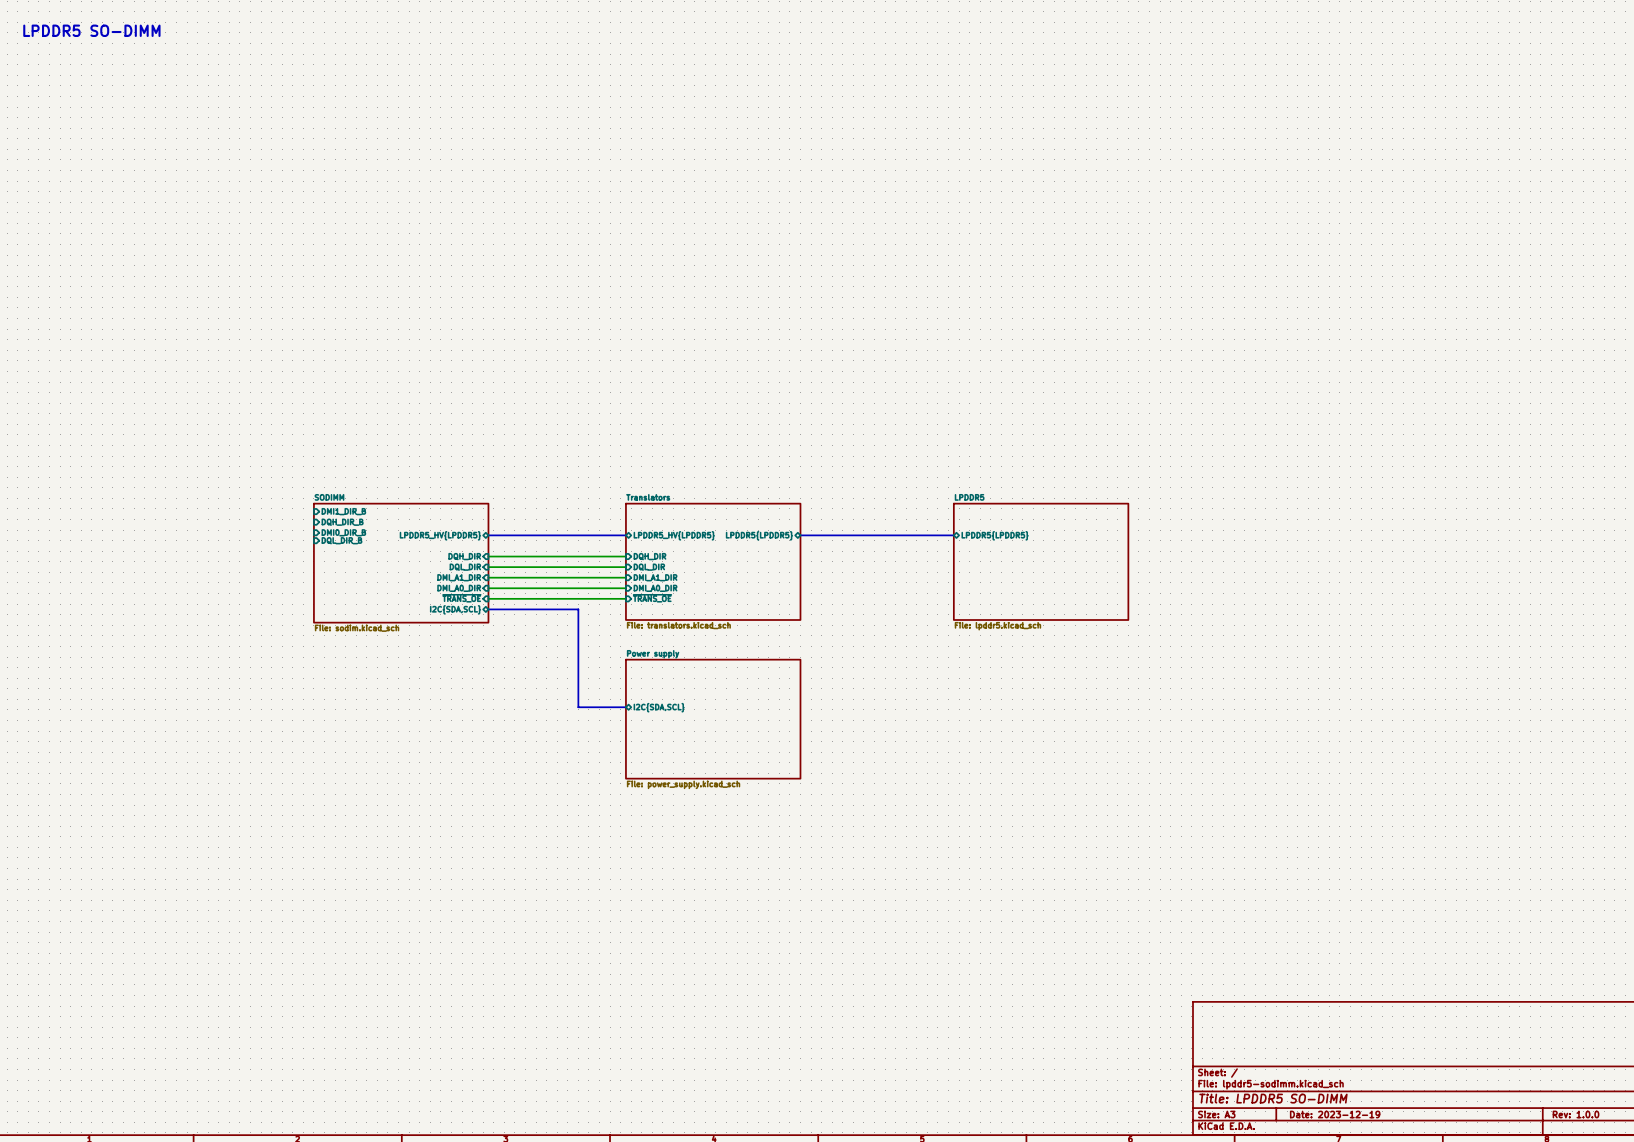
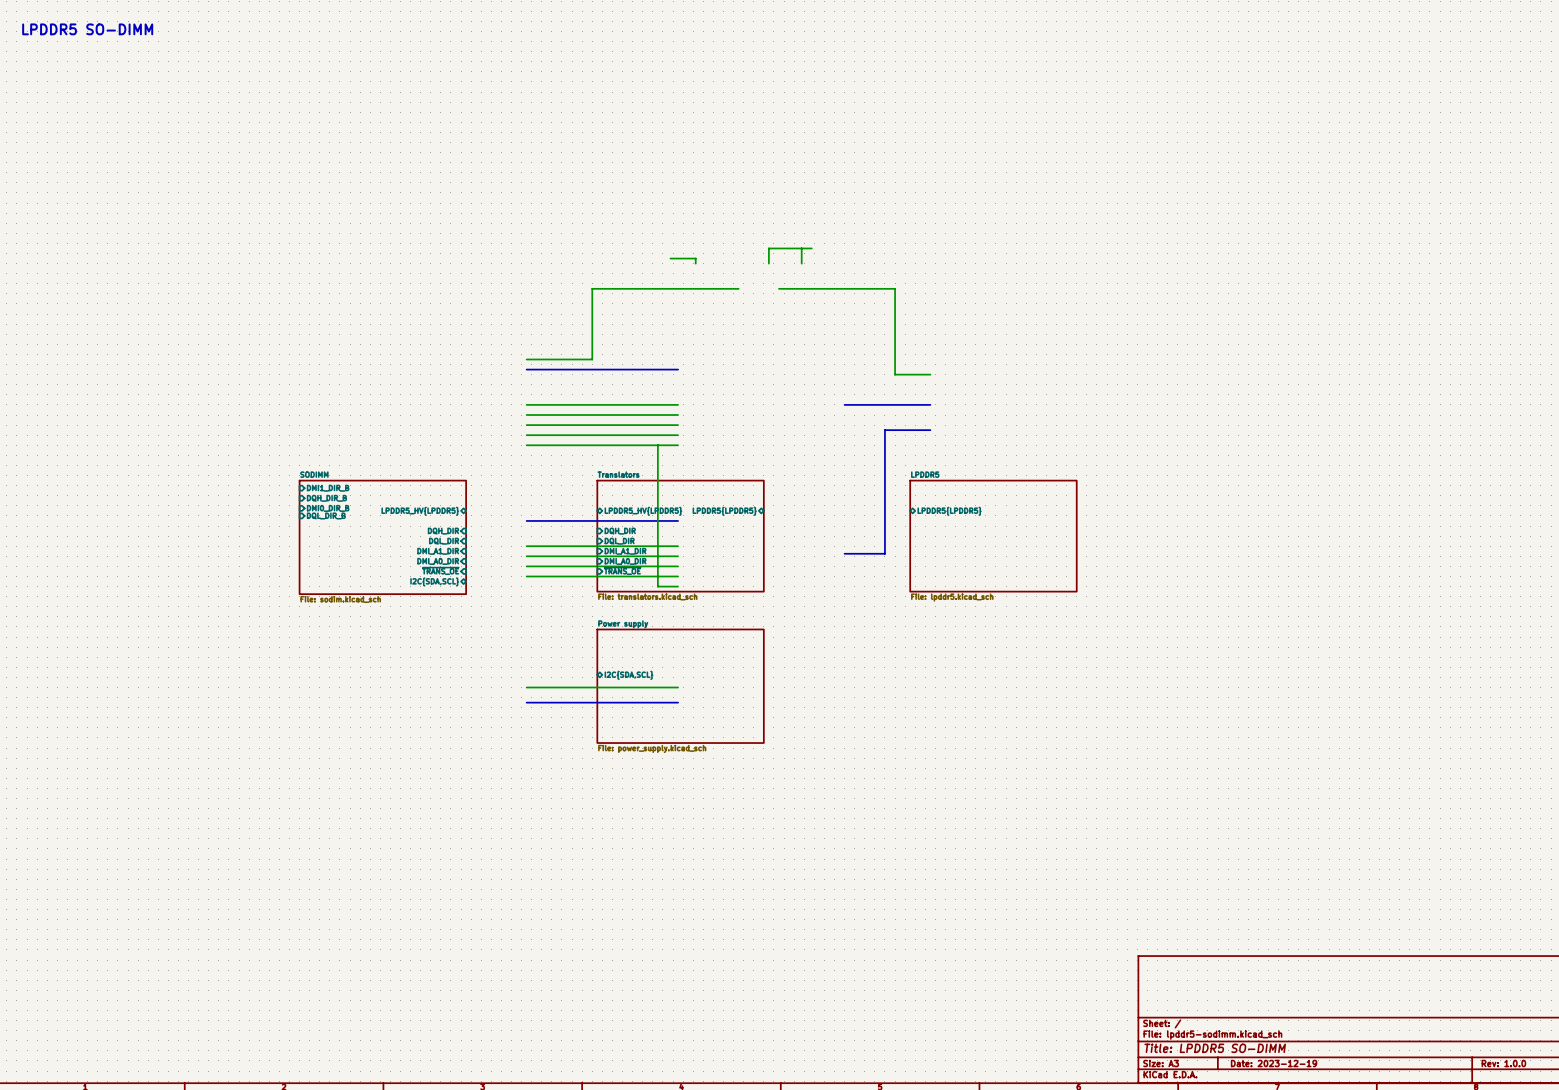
wire: none -> (801, 248) (801, 263)
wire: none -> (811, 248) (768, 248) (768, 263)
wire: none -> (670, 258) (695, 258) (695, 263)
wire: none -> (738, 288) (592, 288) (592, 359) (526, 359)
wire: none -> (778, 288) (895, 288) (895, 374) (930, 374)
bus: none -> (526, 369) (678, 369)
wire: none -> (526, 404) (678, 404)
bus: none -> (844, 404) (930, 404)
wire: none -> (526, 415) (678, 415)
wire: none -> (526, 425) (678, 425)
bus: none -> (930, 430) (884, 430) (884, 553) (844, 553)
wire: none -> (526, 435) (678, 435)
wire: none -> (526, 445) (678, 445)
wire: none -> (657, 445) (657, 586) (678, 586)
bus: (488, 535) (625, 535) -> none
bus: (800, 535) (953, 535) -> none
bus: none -> (526, 520) (678, 520)
wire: (488, 556) (625, 556) -> none
wire: (488, 567) (625, 567) -> none
wire: none -> (526, 546) (678, 546)
wire: (488, 577) (625, 577) -> none
wire: none -> (526, 556) (678, 556)
wire: (488, 588) (625, 588) -> none
wire: none -> (526, 566) (678, 566)
wire: (488, 598) (625, 598) -> none
wire: none -> (526, 576) (678, 576)
bus: (488, 609) (578, 609) (578, 707) (625, 707) -> none
wire: none -> (526, 687) (678, 687)
bus: none -> (526, 702) (678, 702)

